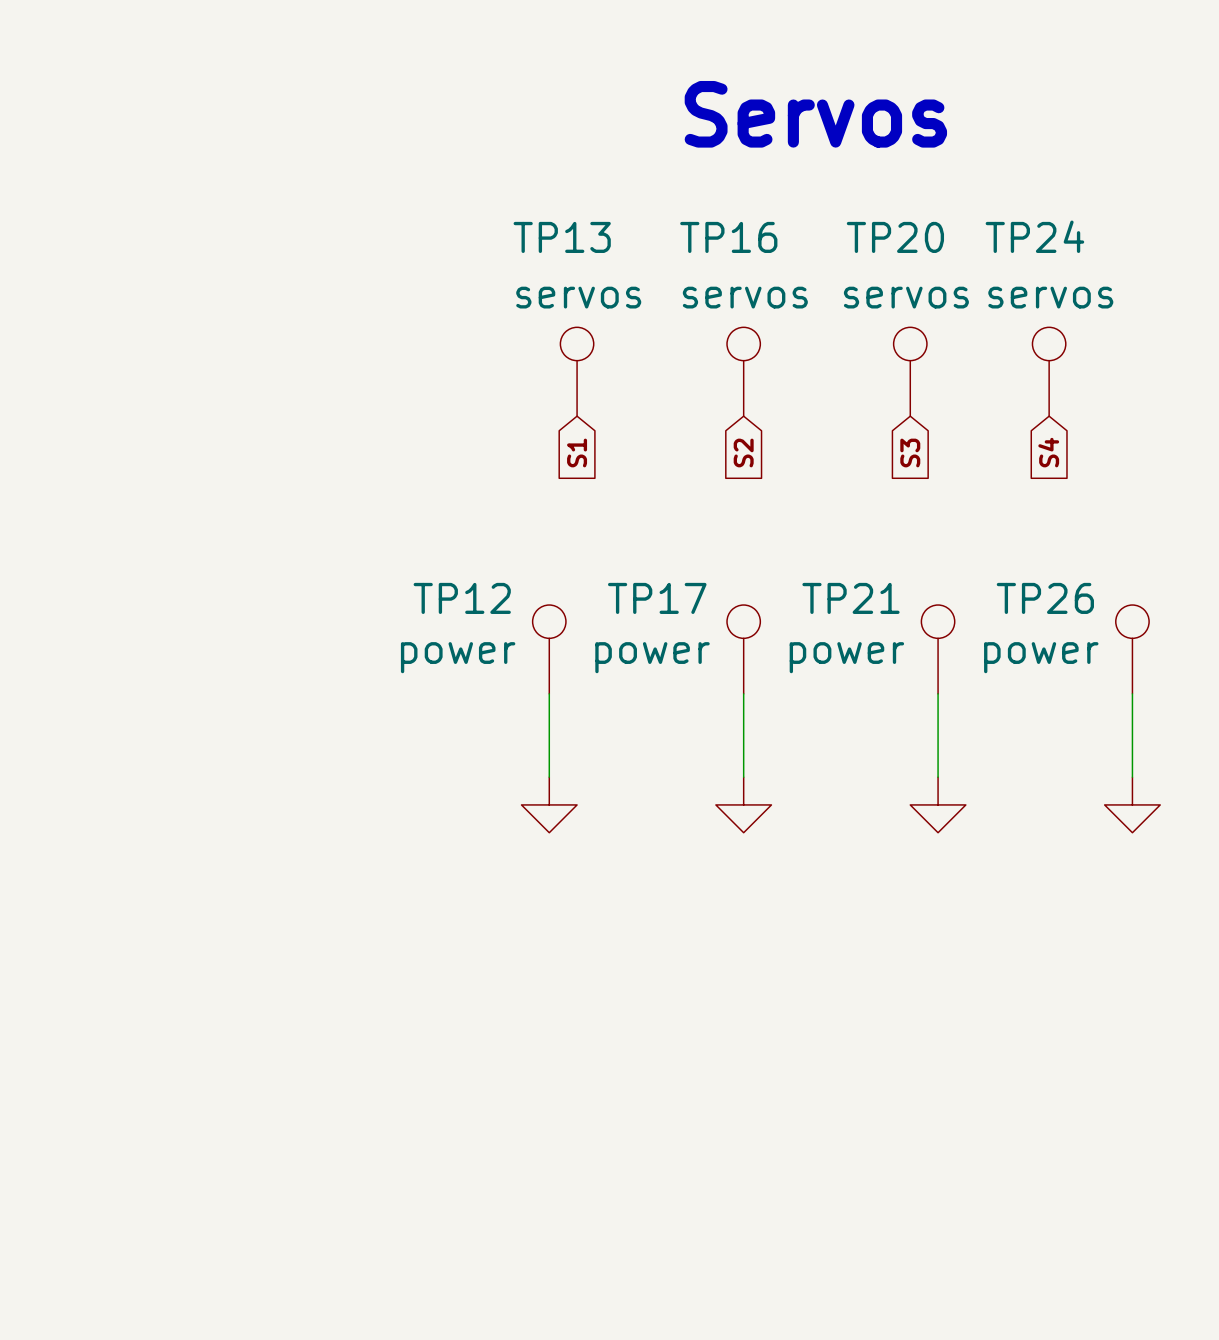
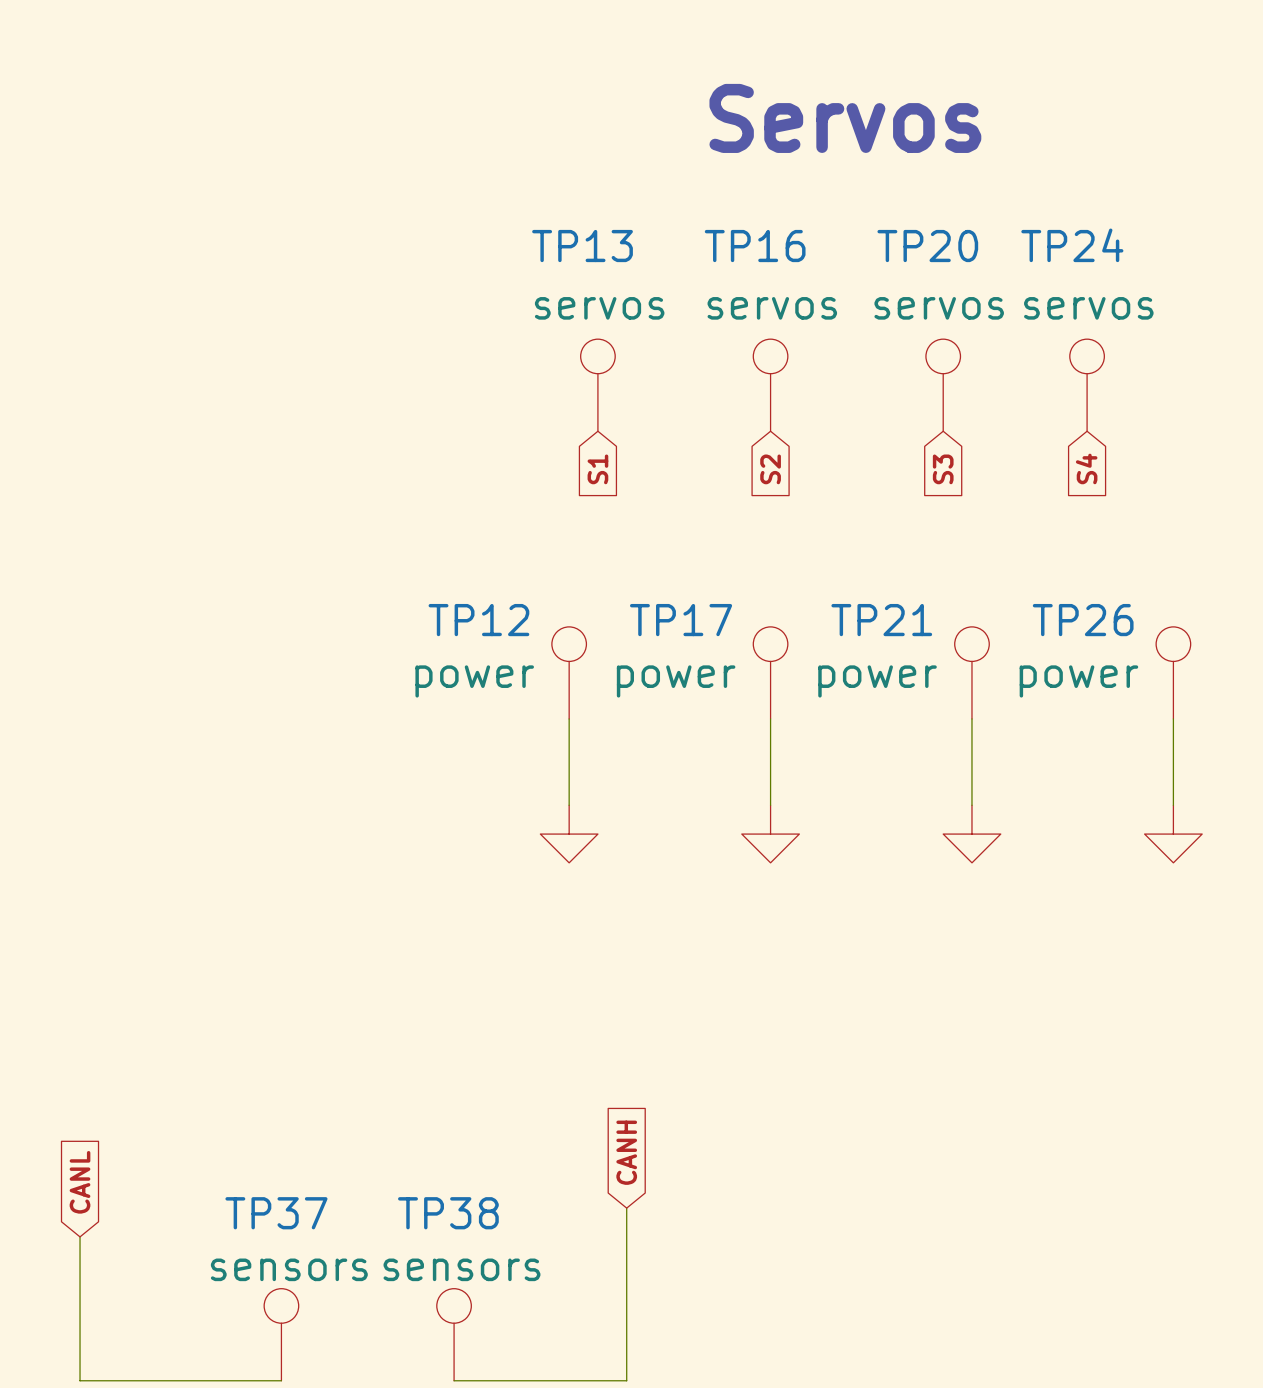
global label: none -> CANH (626, 1152)
global label: none -> CANL (80, 1182)
wire: none -> (626, 1208) (626, 1380) (454, 1380)
wire: none -> (80, 1236) (80, 1380) (281, 1380)
TP37: none -> sensors (281, 1334)
TP38: none -> sensors (454, 1334)

